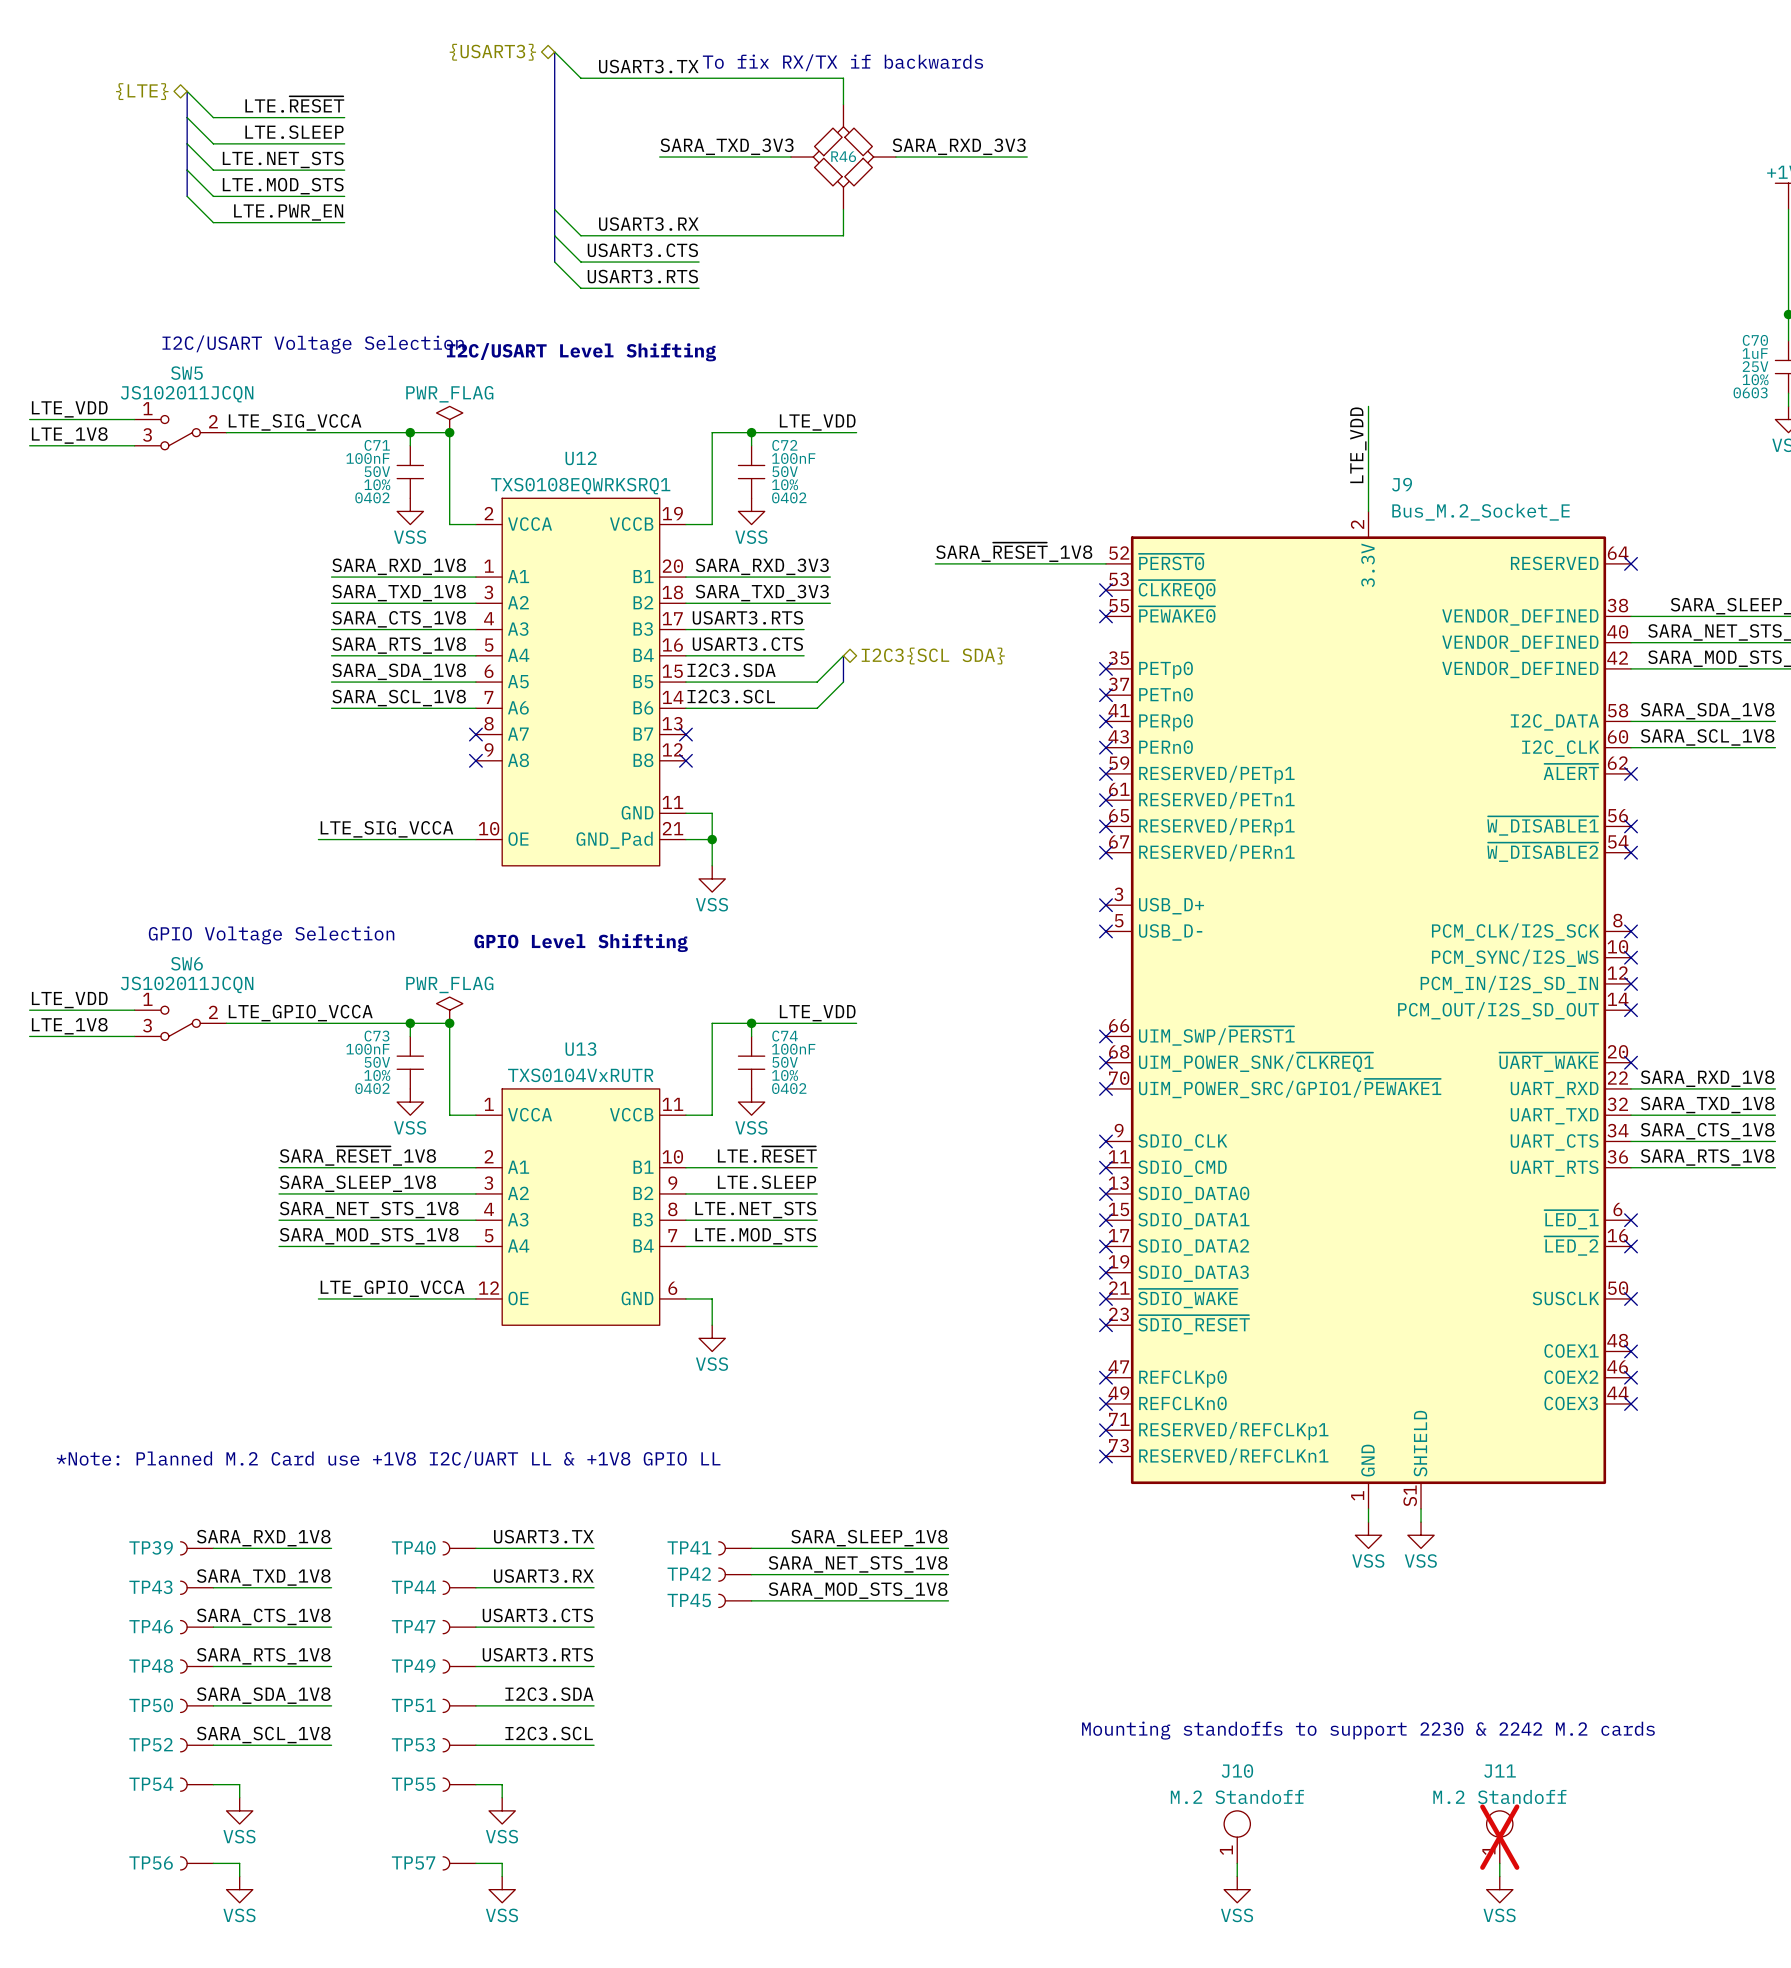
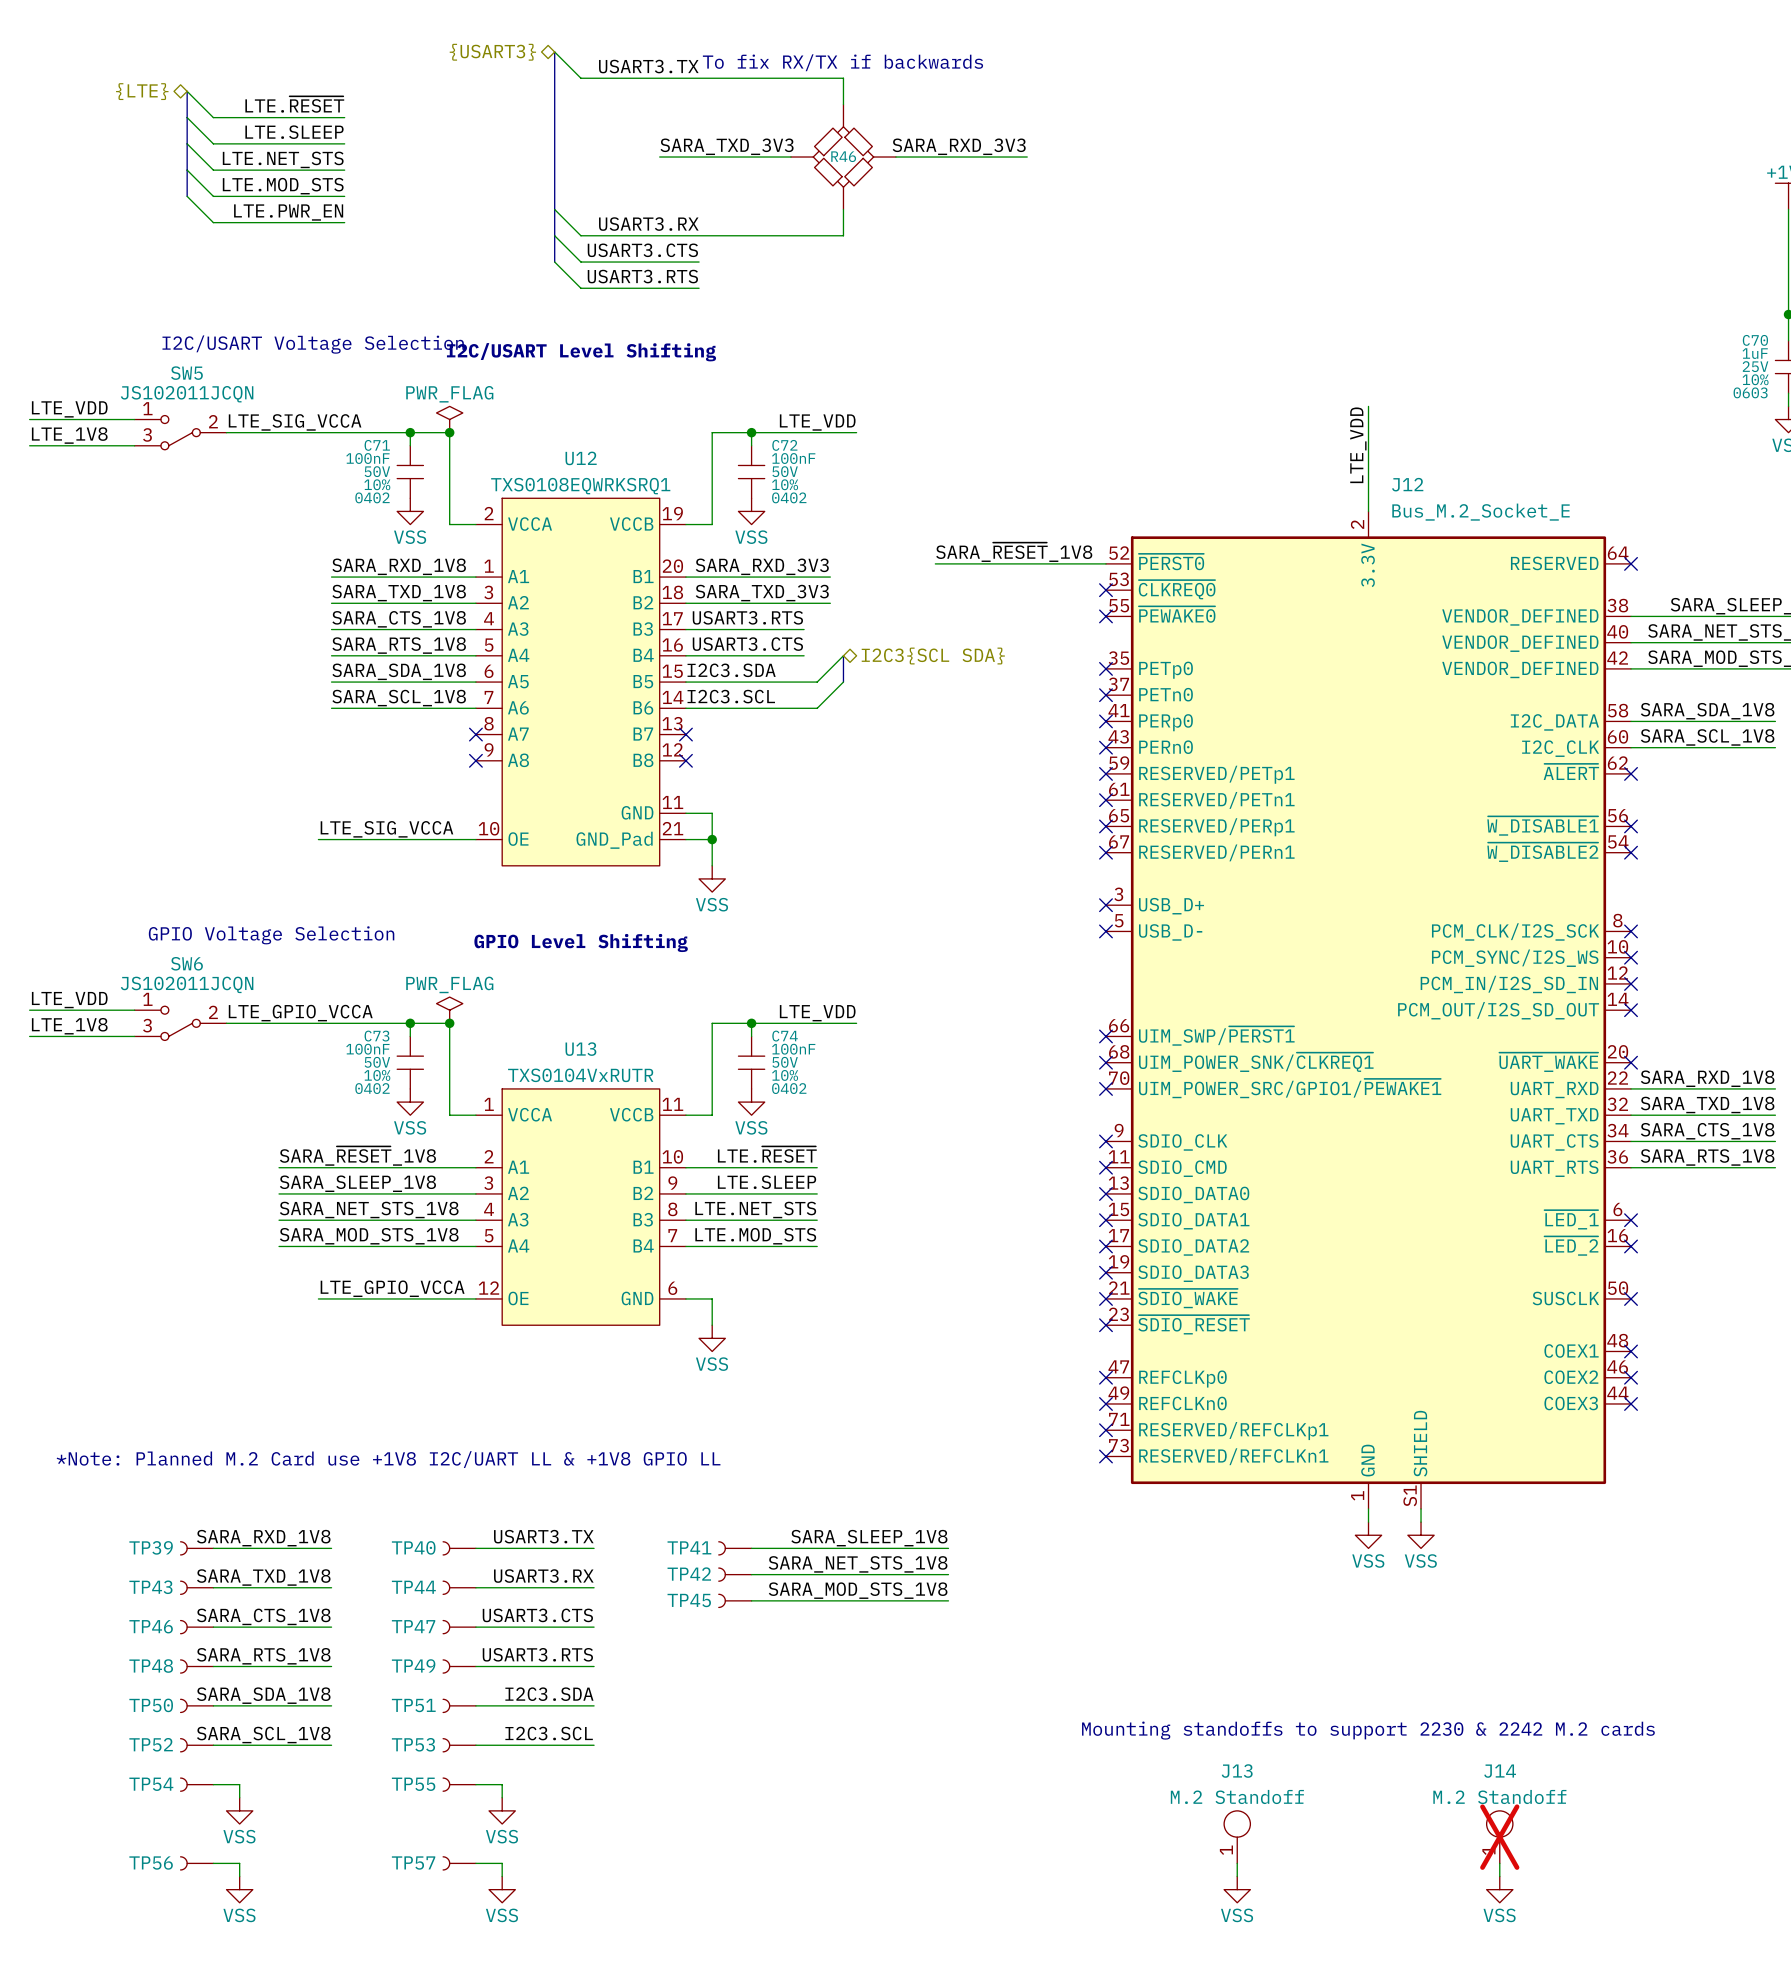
J9 name: J9 (1402, 484) -> J12 (1407, 484)
J10 name: J10 (1237, 1771) -> J13 (1237, 1771)
J11 name: J11 (1500, 1771) -> J14 (1500, 1771)

